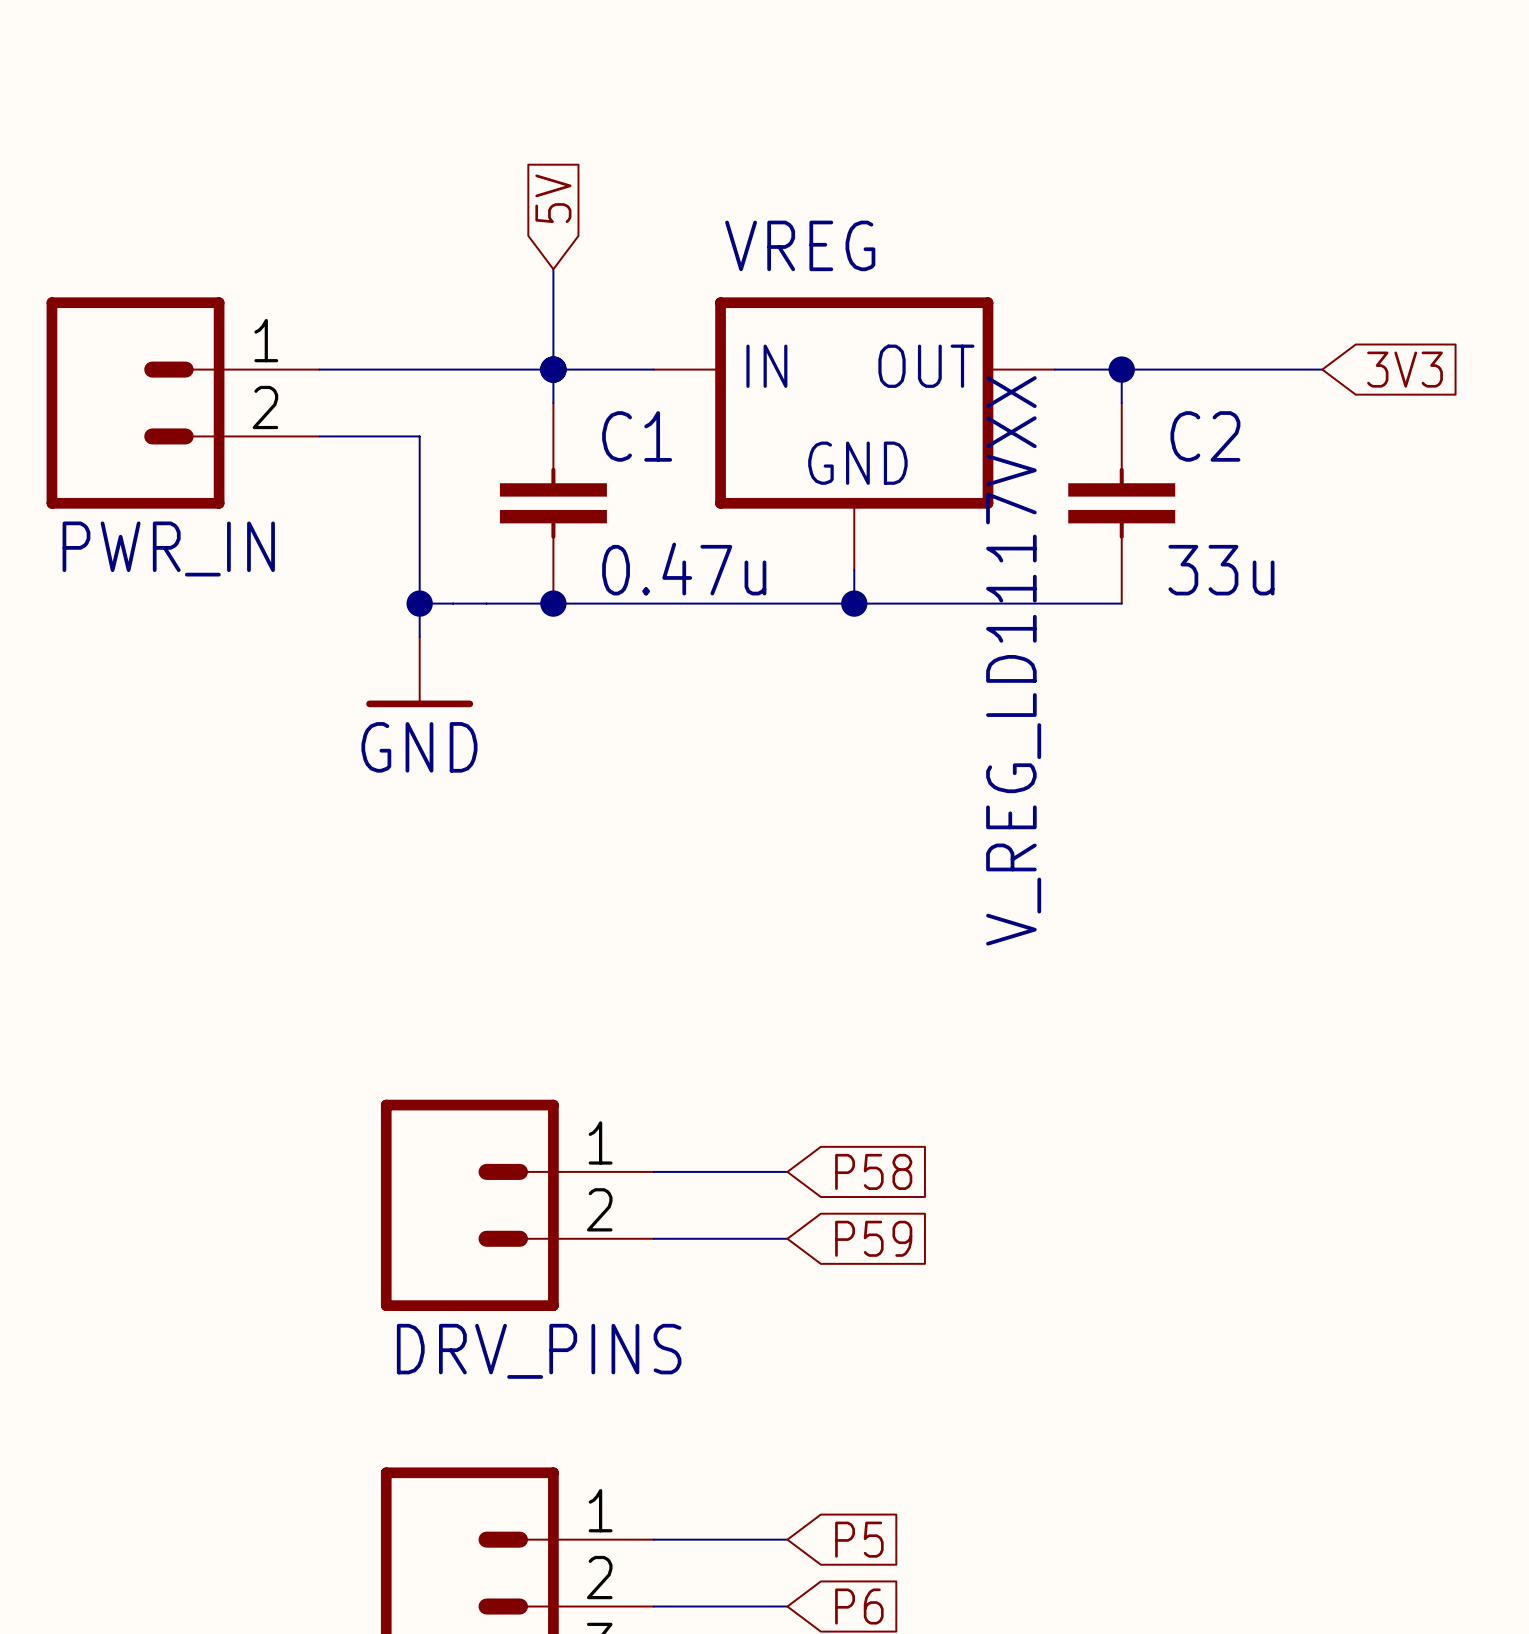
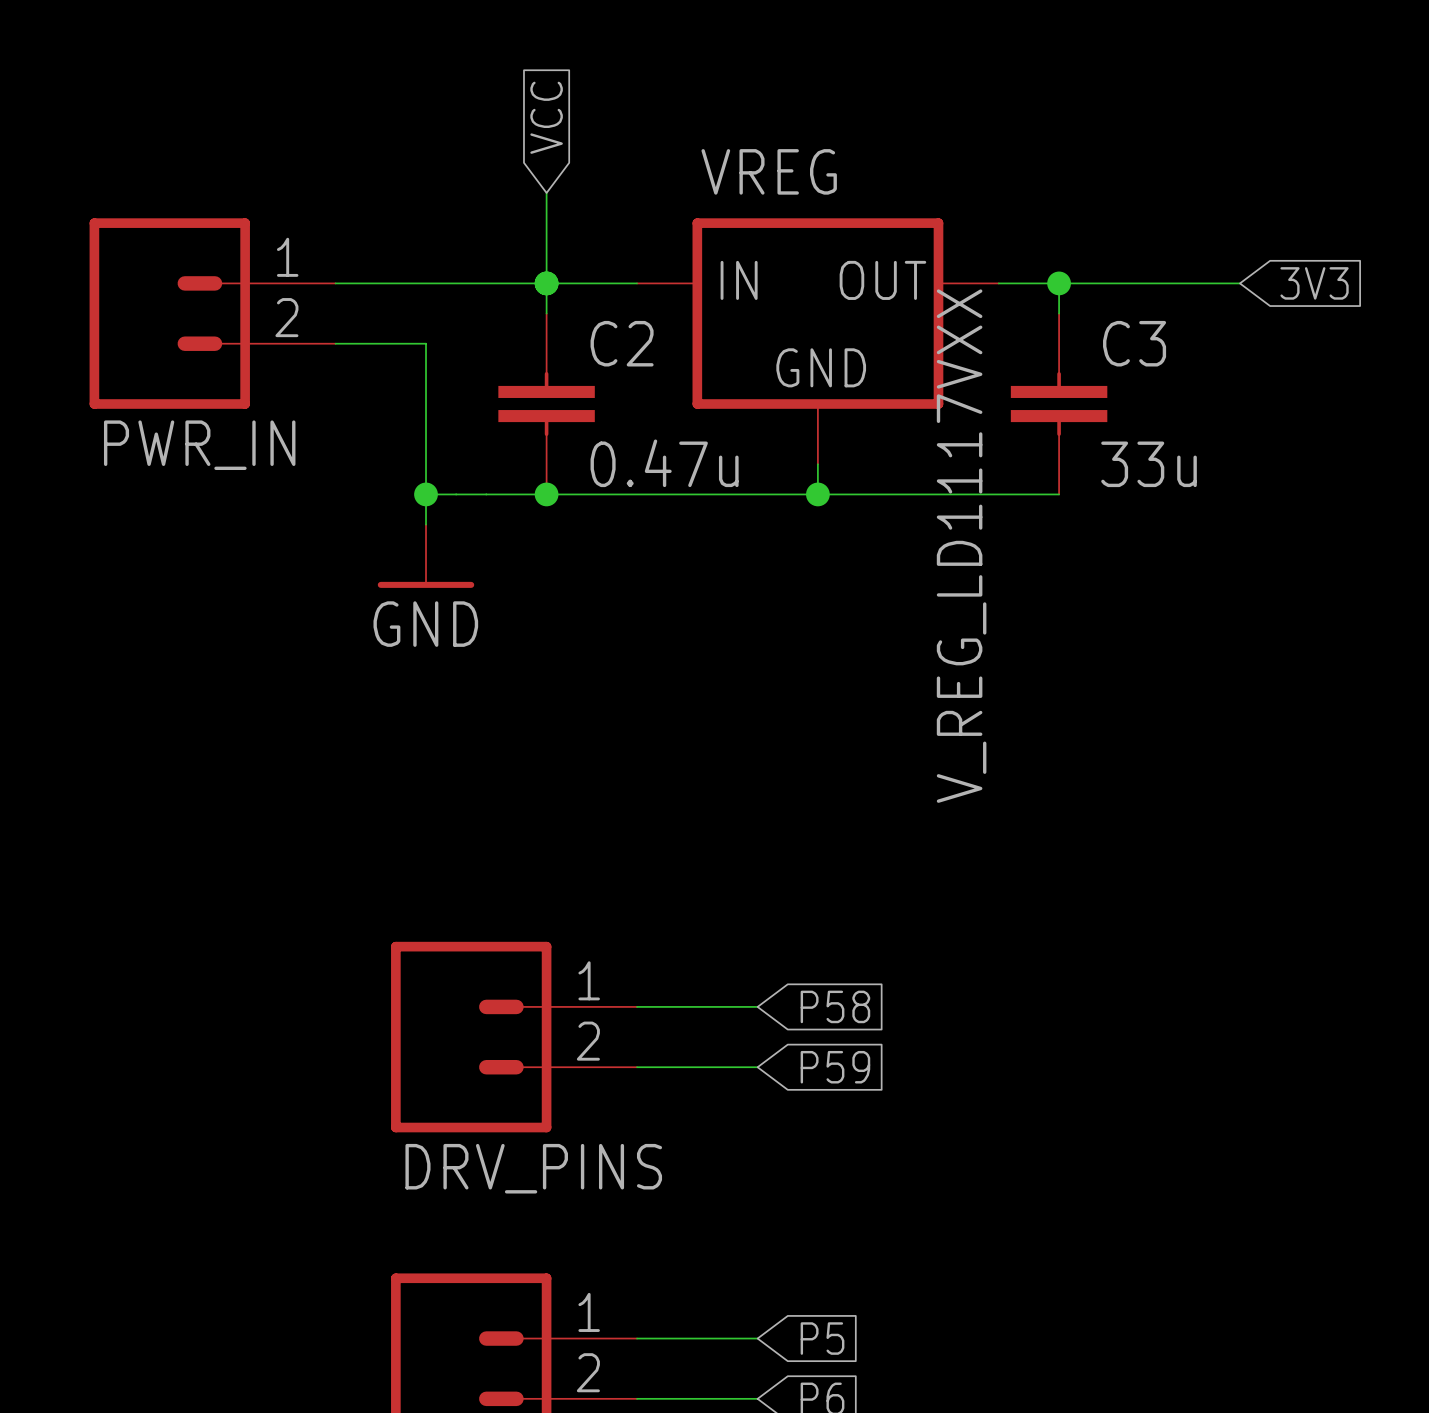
global label: 5V (553, 198) -> VCC (546, 117)
C1 name: C1 (637, 436) -> C2 (622, 343)
C2 name: C2 (1205, 436) -> C3 (1134, 343)

